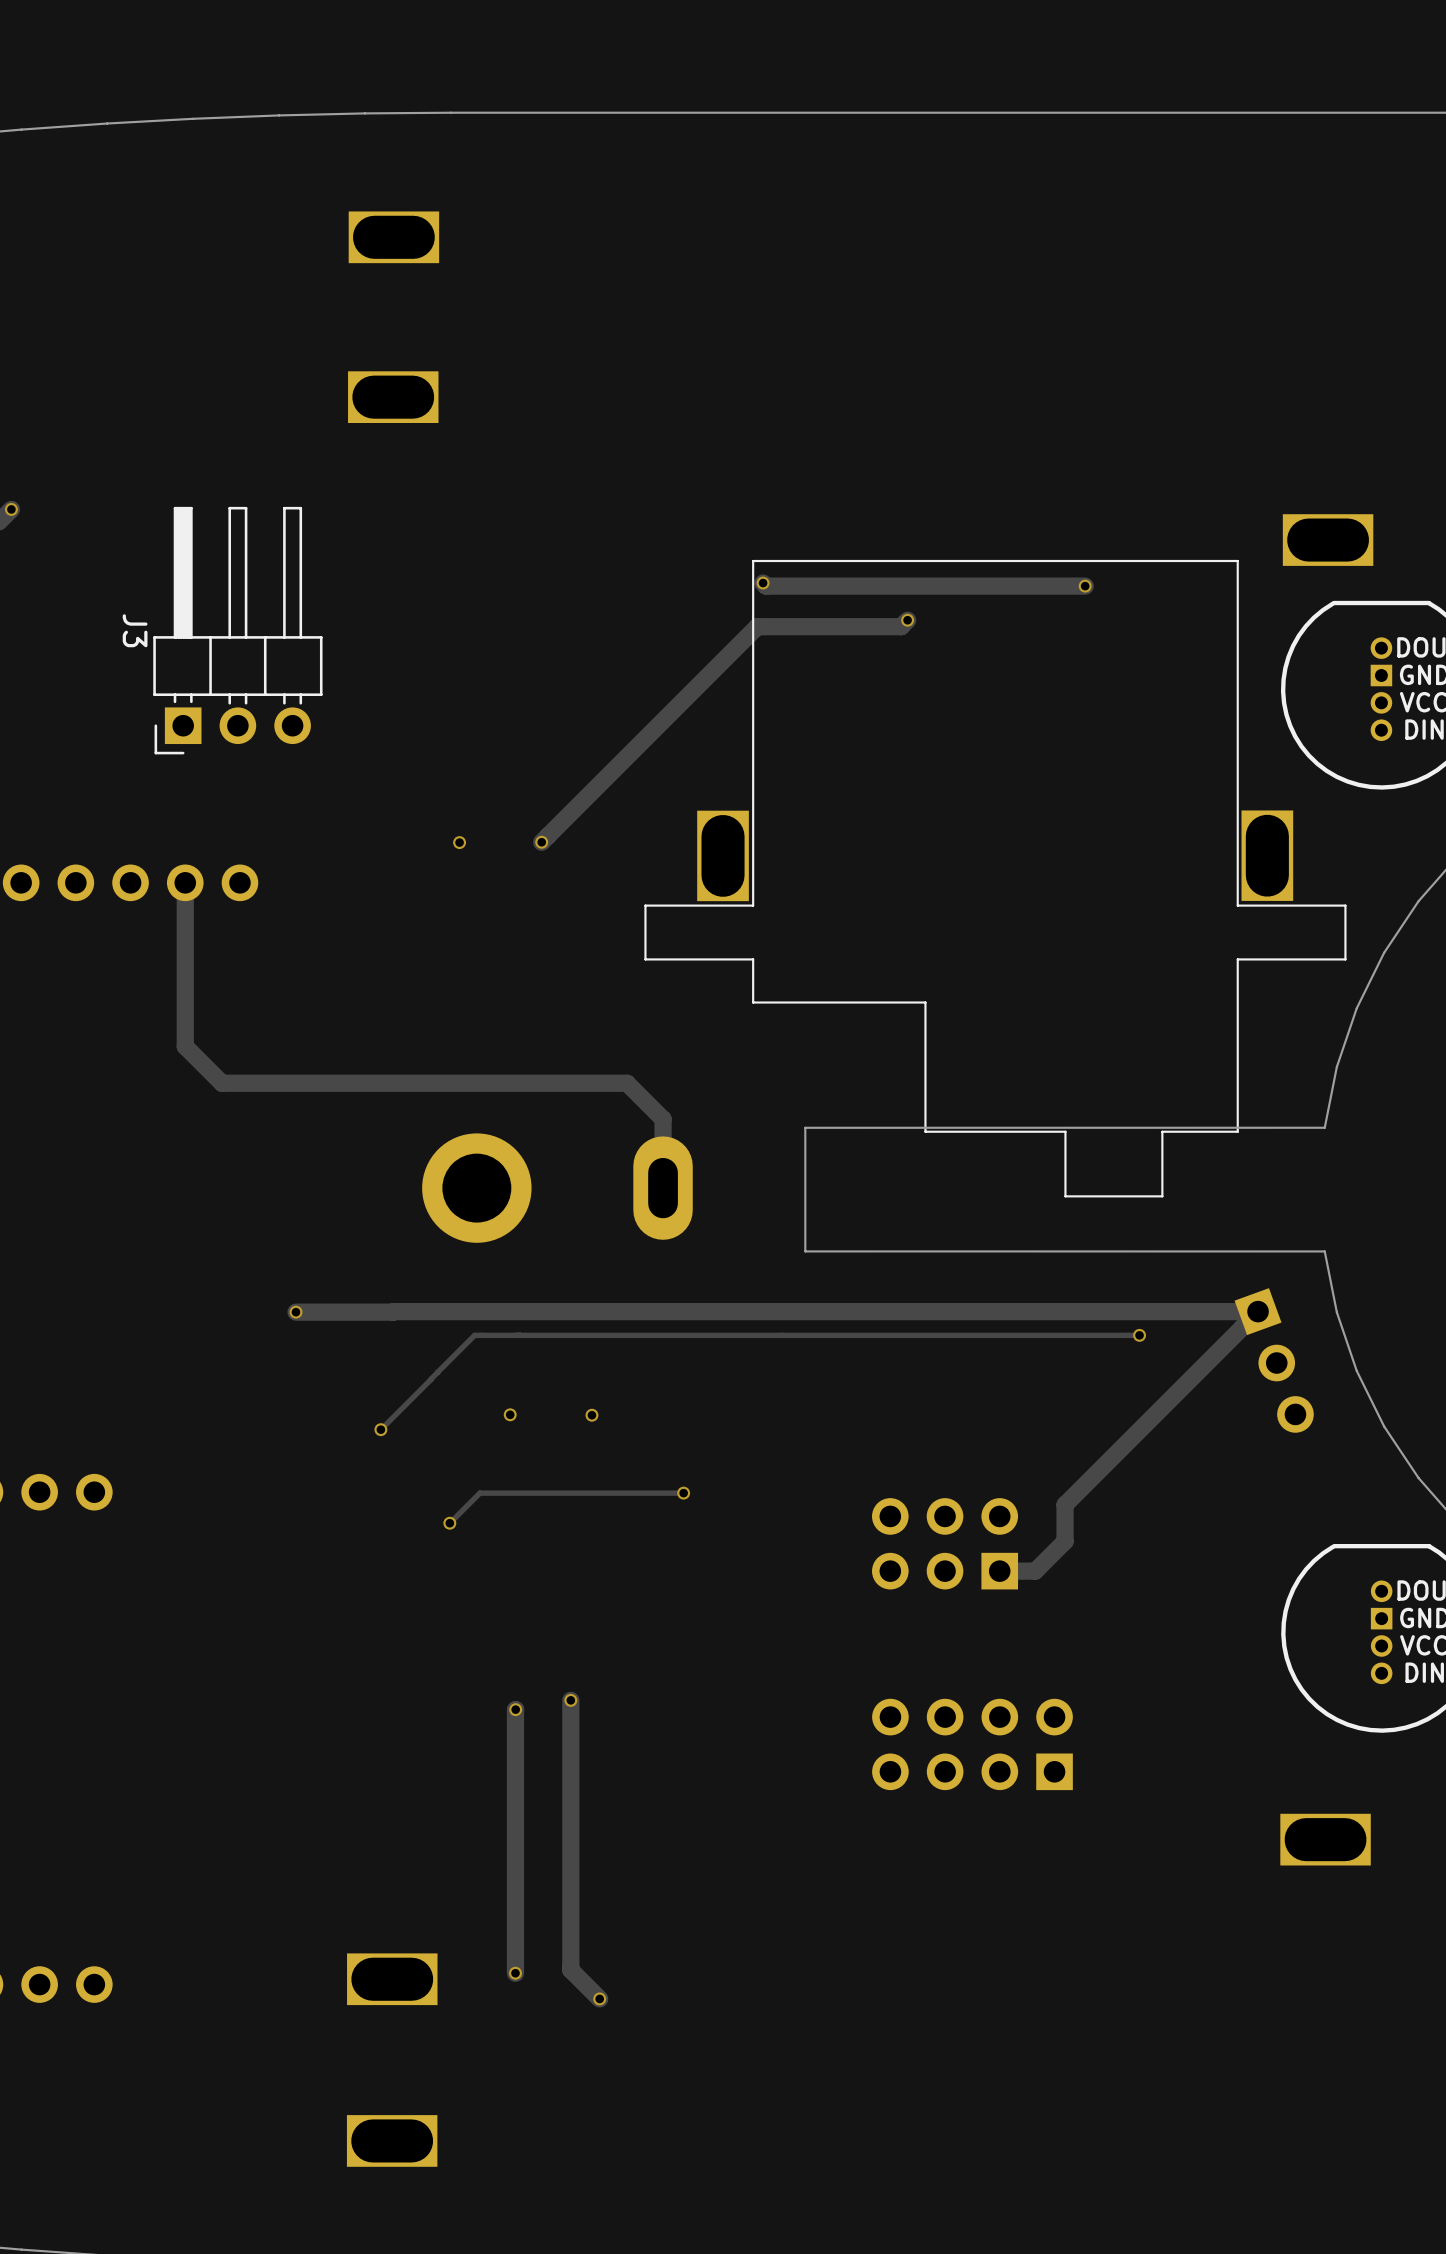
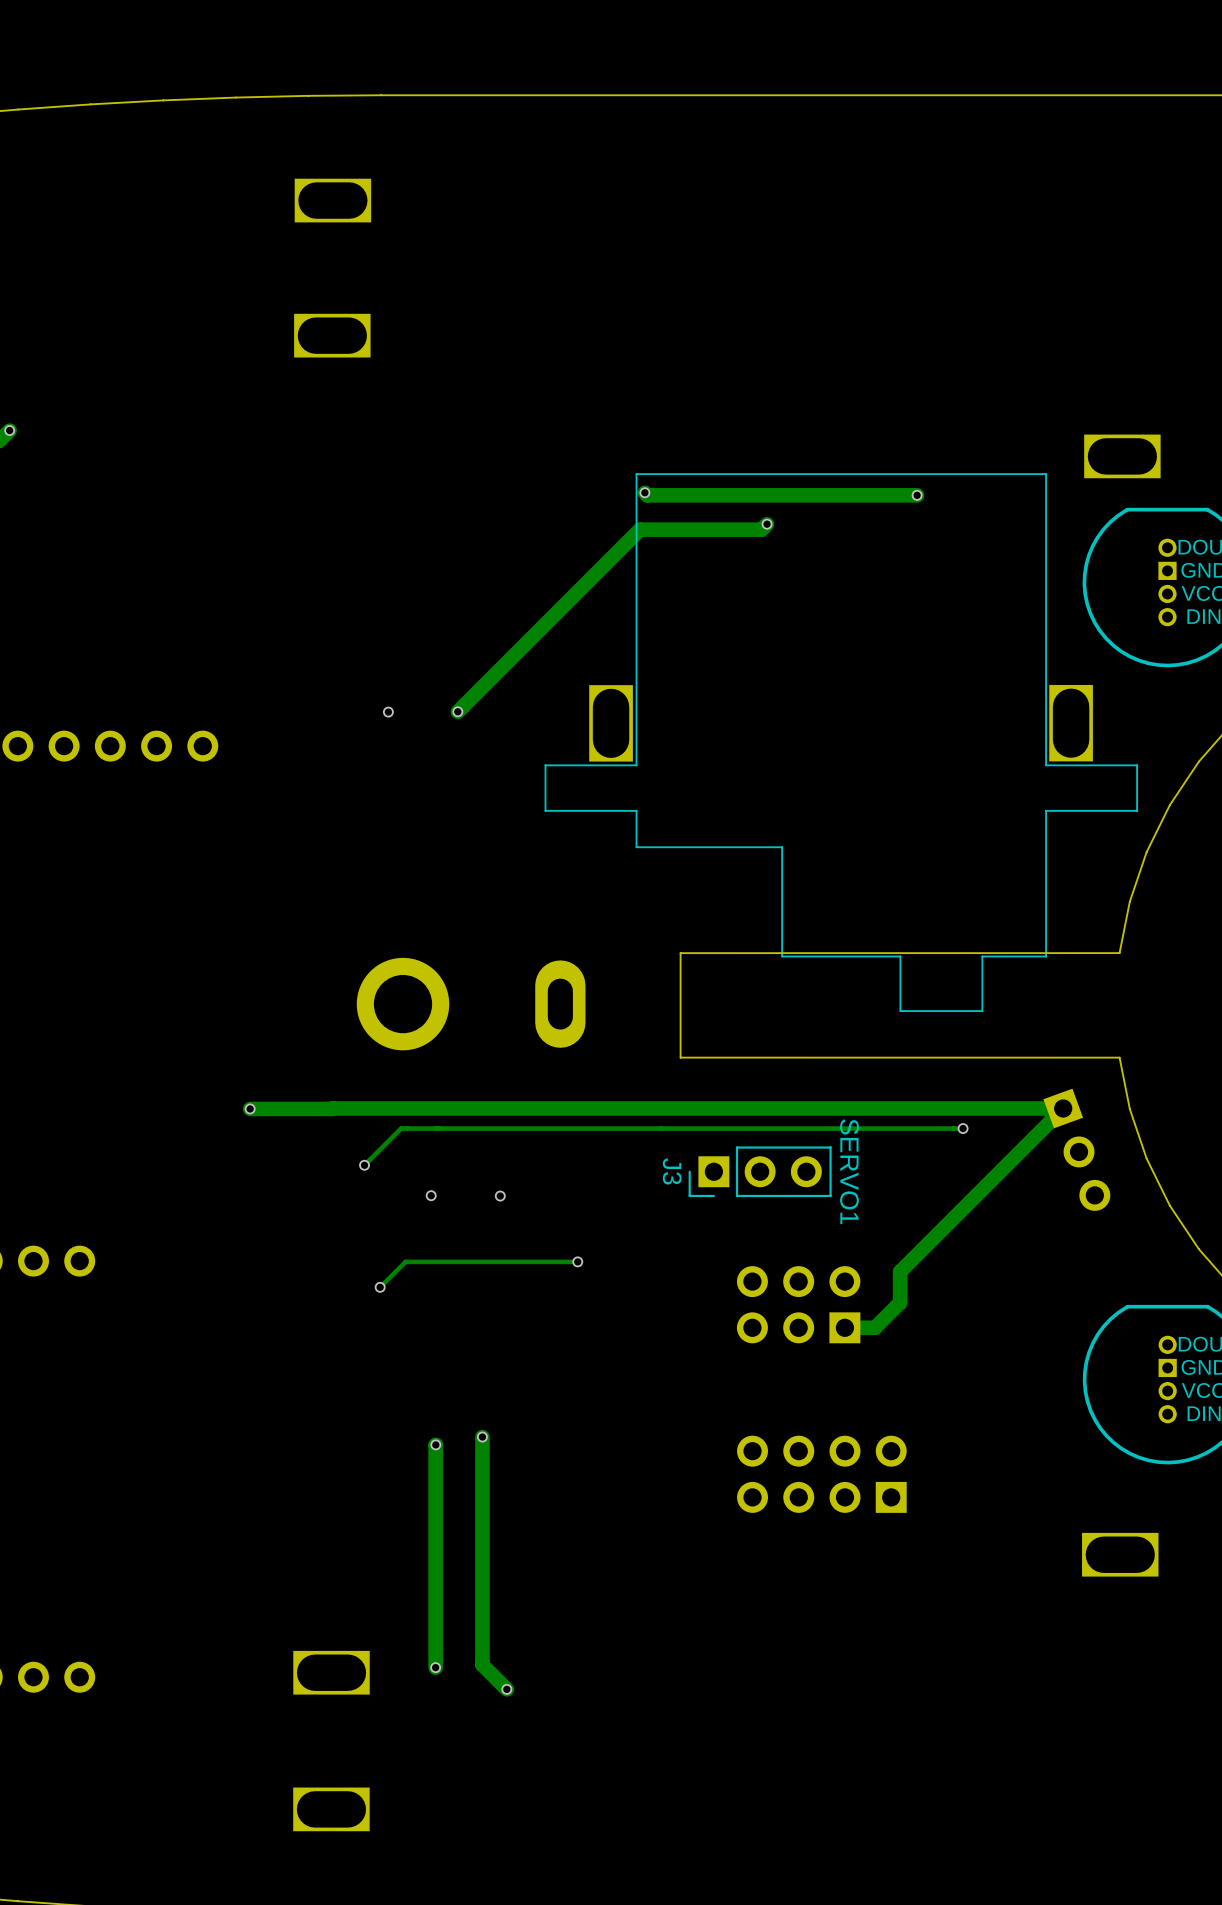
J3 footprint: [153, 506, 323, 755] -> [688, 1146, 832, 1198]
track: (185, 882) (185, 1046) (222, 1083) (627, 1083) (663, 1119) (663, 1188) -> none
track: (431, 1378) (380, 1429) -> none
J3 value: none -> SERVO1 (849, 1171)
via position: (380, 1429) -> (364, 1165)

